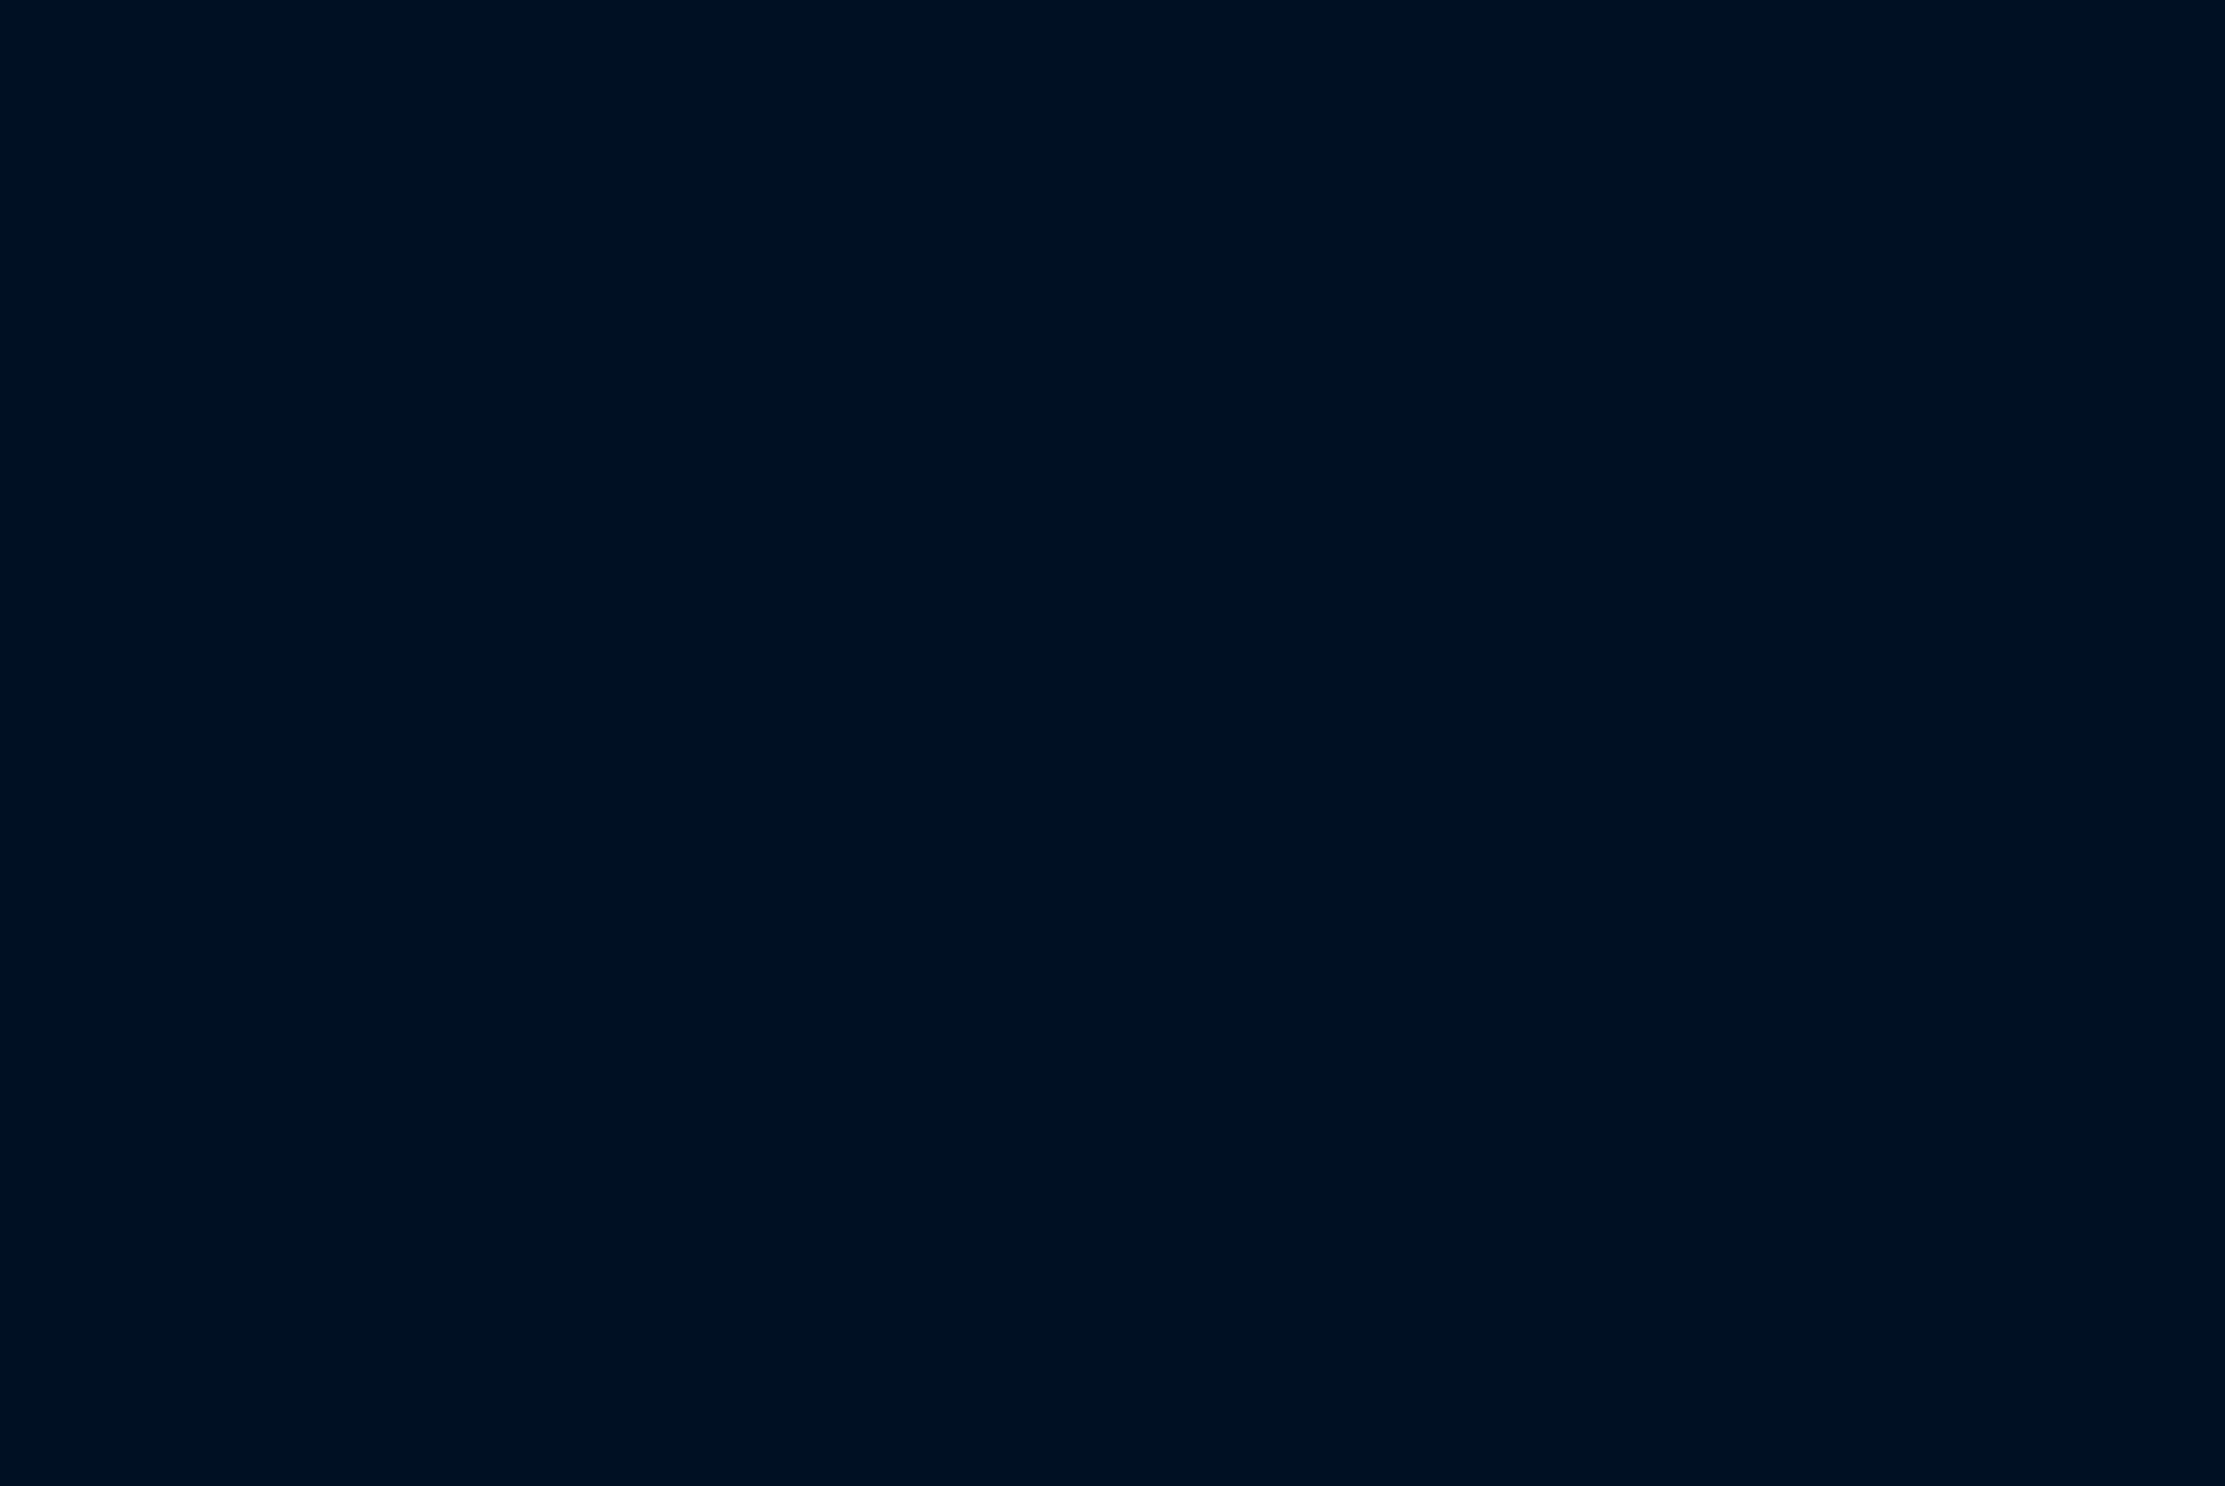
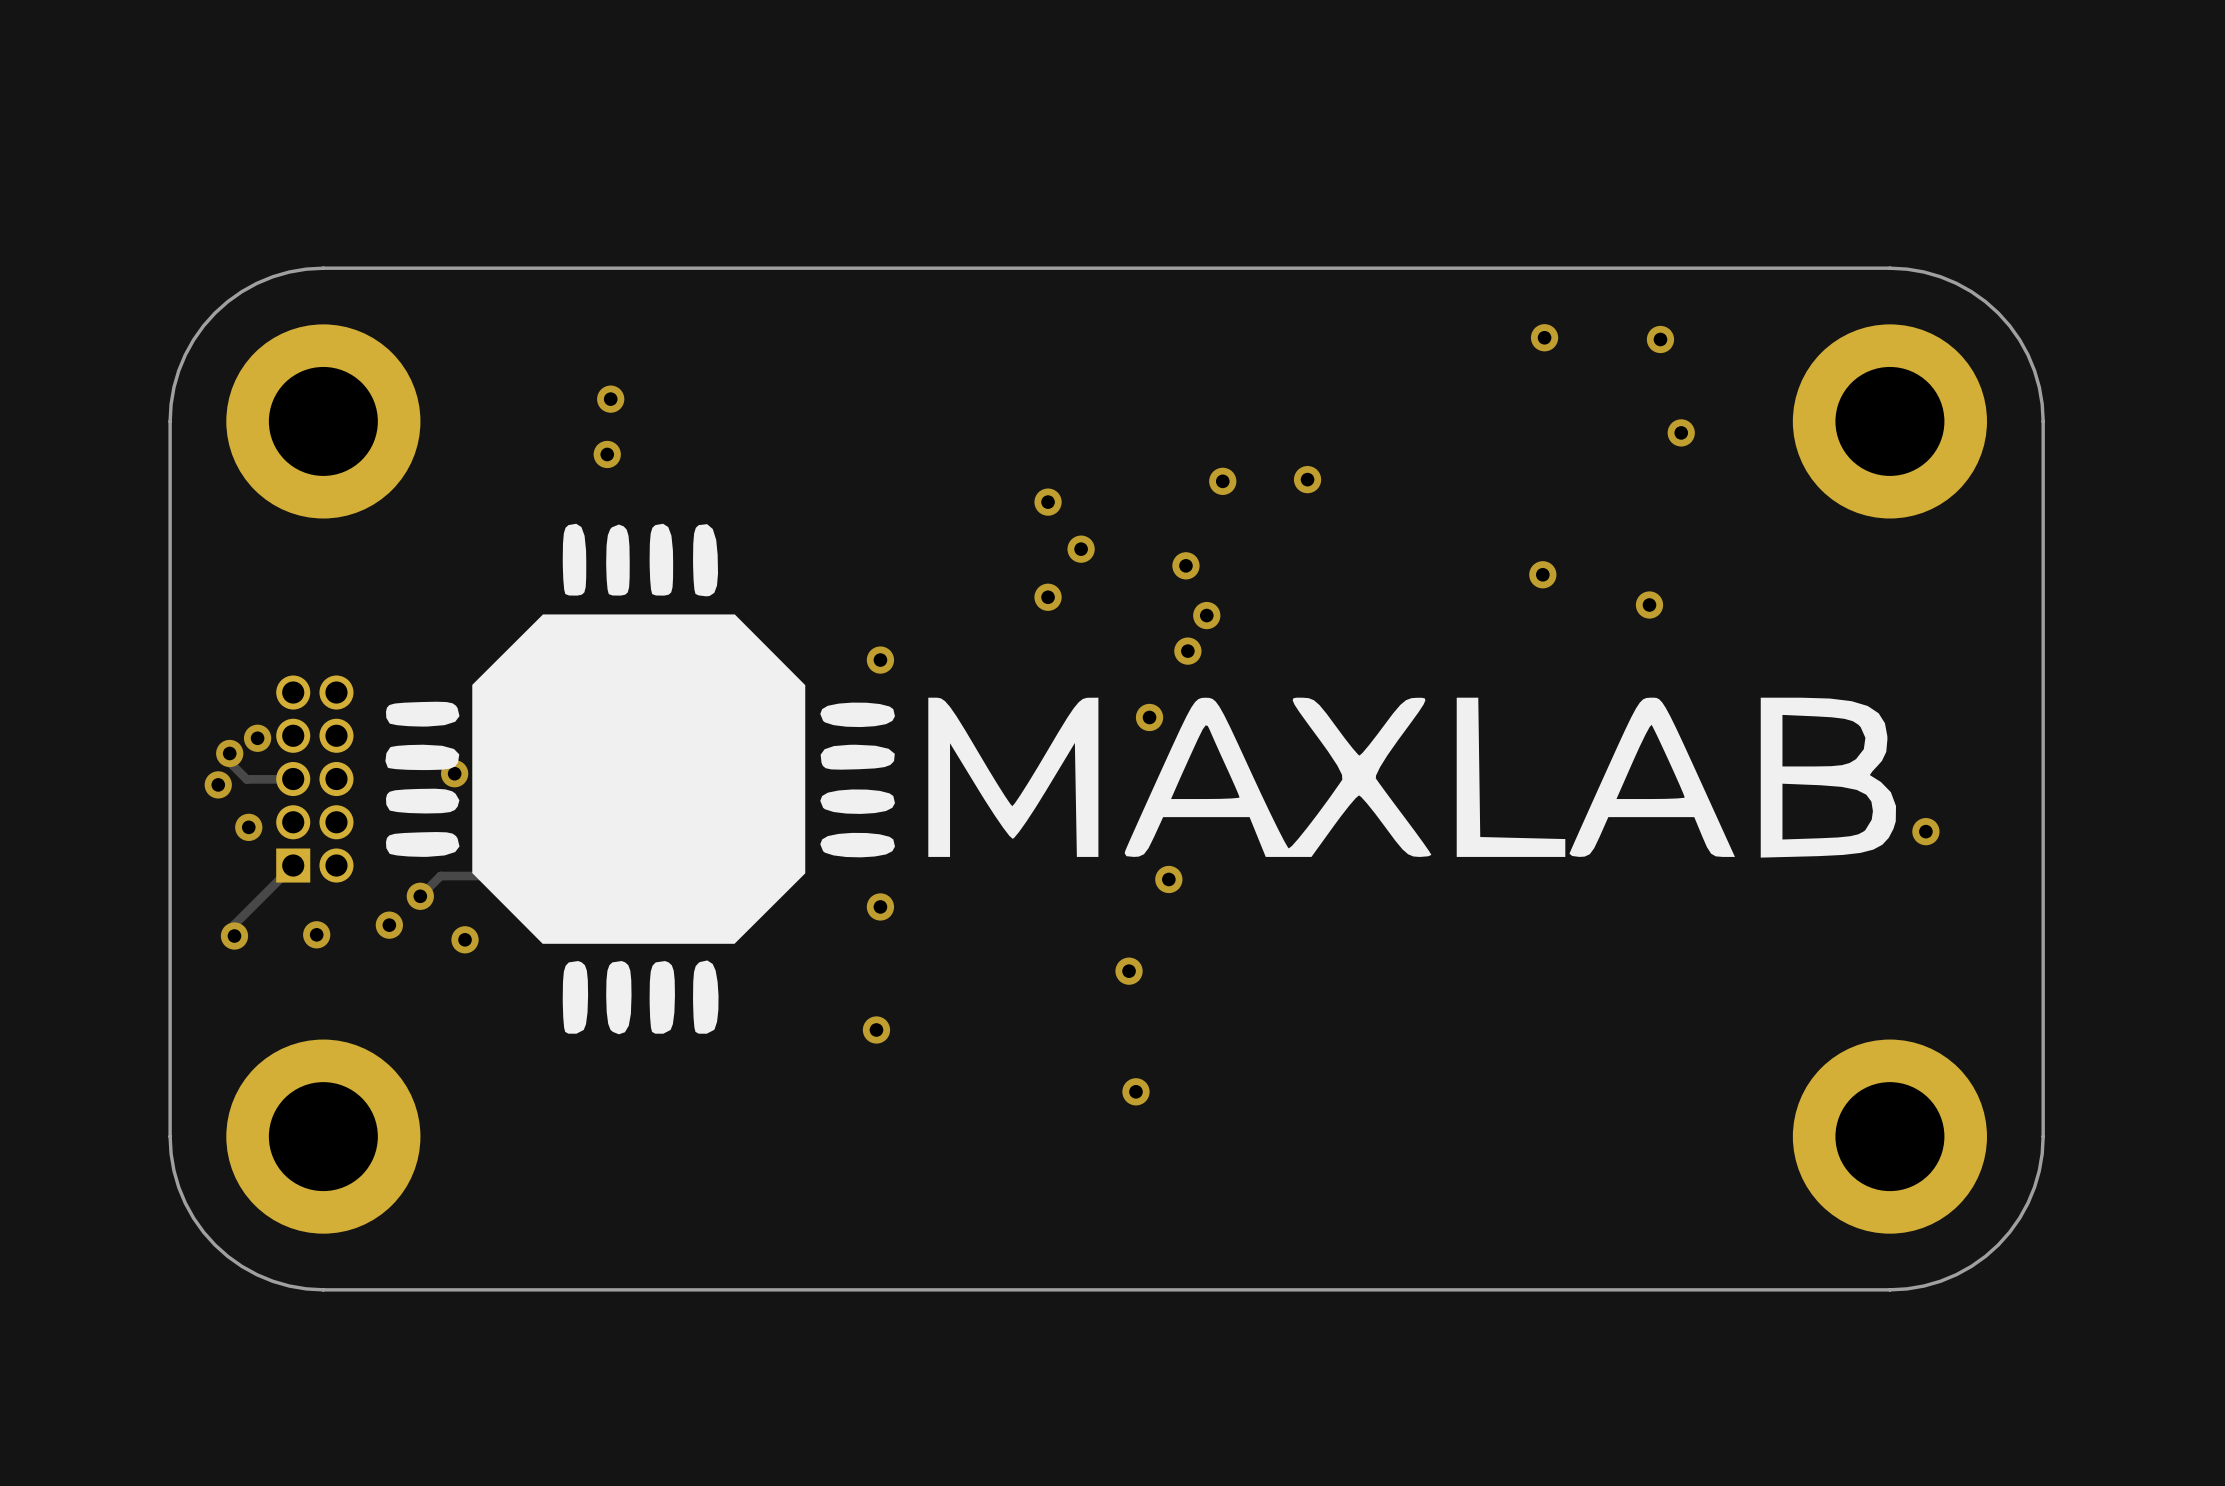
board edge: none -> (1889, 268) (323, 268) (289, 272) (256, 283) (241, 291) (215, 313) (203, 325) (185, 354) (173, 387) (170, 421) (170, 1136) (171, 1153) (178, 1187) (193, 1218) (215, 1244) (241, 1266) (272, 1281) (289, 1286) (323, 1289) (1889, 1289) (1907, 1288) (1940, 1281) (1971, 1266) (1998, 1244) (2019, 1218) (2034, 1187) (2042, 1153) (2042, 404) (2034, 370) (2028, 354) (2009, 325) (1985, 301) (1956, 283) (1940, 276) (1924, 272) (1889, 268)
via: none -> (1544, 337)
via: none -> (1660, 339)
via: none -> (610, 399)
part: none -> (323, 421)
part: none -> (1889, 421)
via: none -> (1681, 432)
via: none -> (607, 454)
via: none -> (1307, 479)
via: none -> (1222, 481)
via: none -> (1048, 502)
drawing: none -> [385, 523, 1897, 1035]
via: none -> (1081, 549)
via: none -> (1185, 565)
via: none -> (1542, 574)
via: none -> (1048, 597)
via: none -> (1649, 605)
via: none -> (1206, 615)
via: none -> (1187, 651)
via: none -> (880, 660)
via: none -> (1149, 717)
via: none -> (257, 738)
track: none -> (229, 753) (229, 762) (246, 779) (293, 779)
via: none -> (229, 753)
via: none -> (454, 773)
part: none -> (314, 779)
via: none -> (218, 784)
via: none -> (248, 827)
via: none -> (1925, 831)
track: none -> (293, 865) (234, 924) (234, 936)
track: none -> (527, 876) (440, 876) (420, 896)
via: none -> (1168, 879)
via: none -> (420, 896)
via: none -> (880, 906)
via: none -> (389, 925)
via: none -> (316, 934)
via: none -> (234, 936)
via: none -> (465, 939)
via: none -> (1129, 971)
via: none -> (876, 1029)
via: none -> (1135, 1091)
part: none -> (323, 1136)
part: none -> (1889, 1136)

